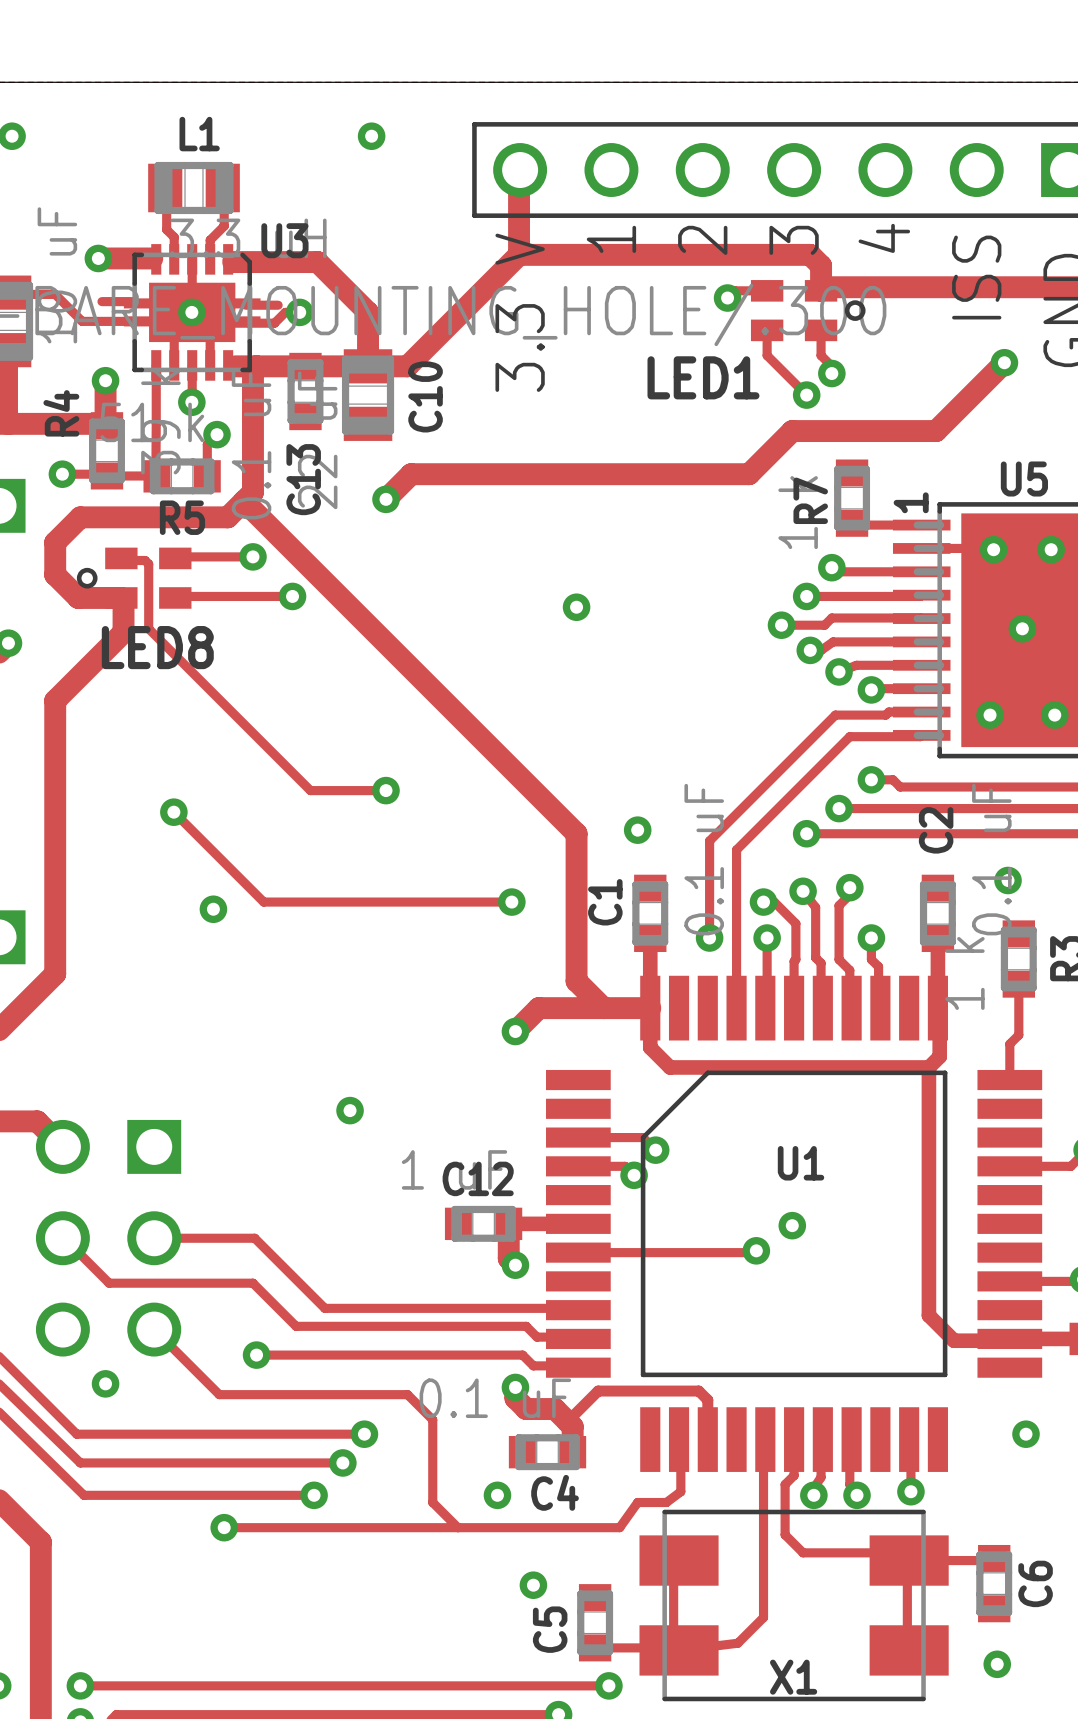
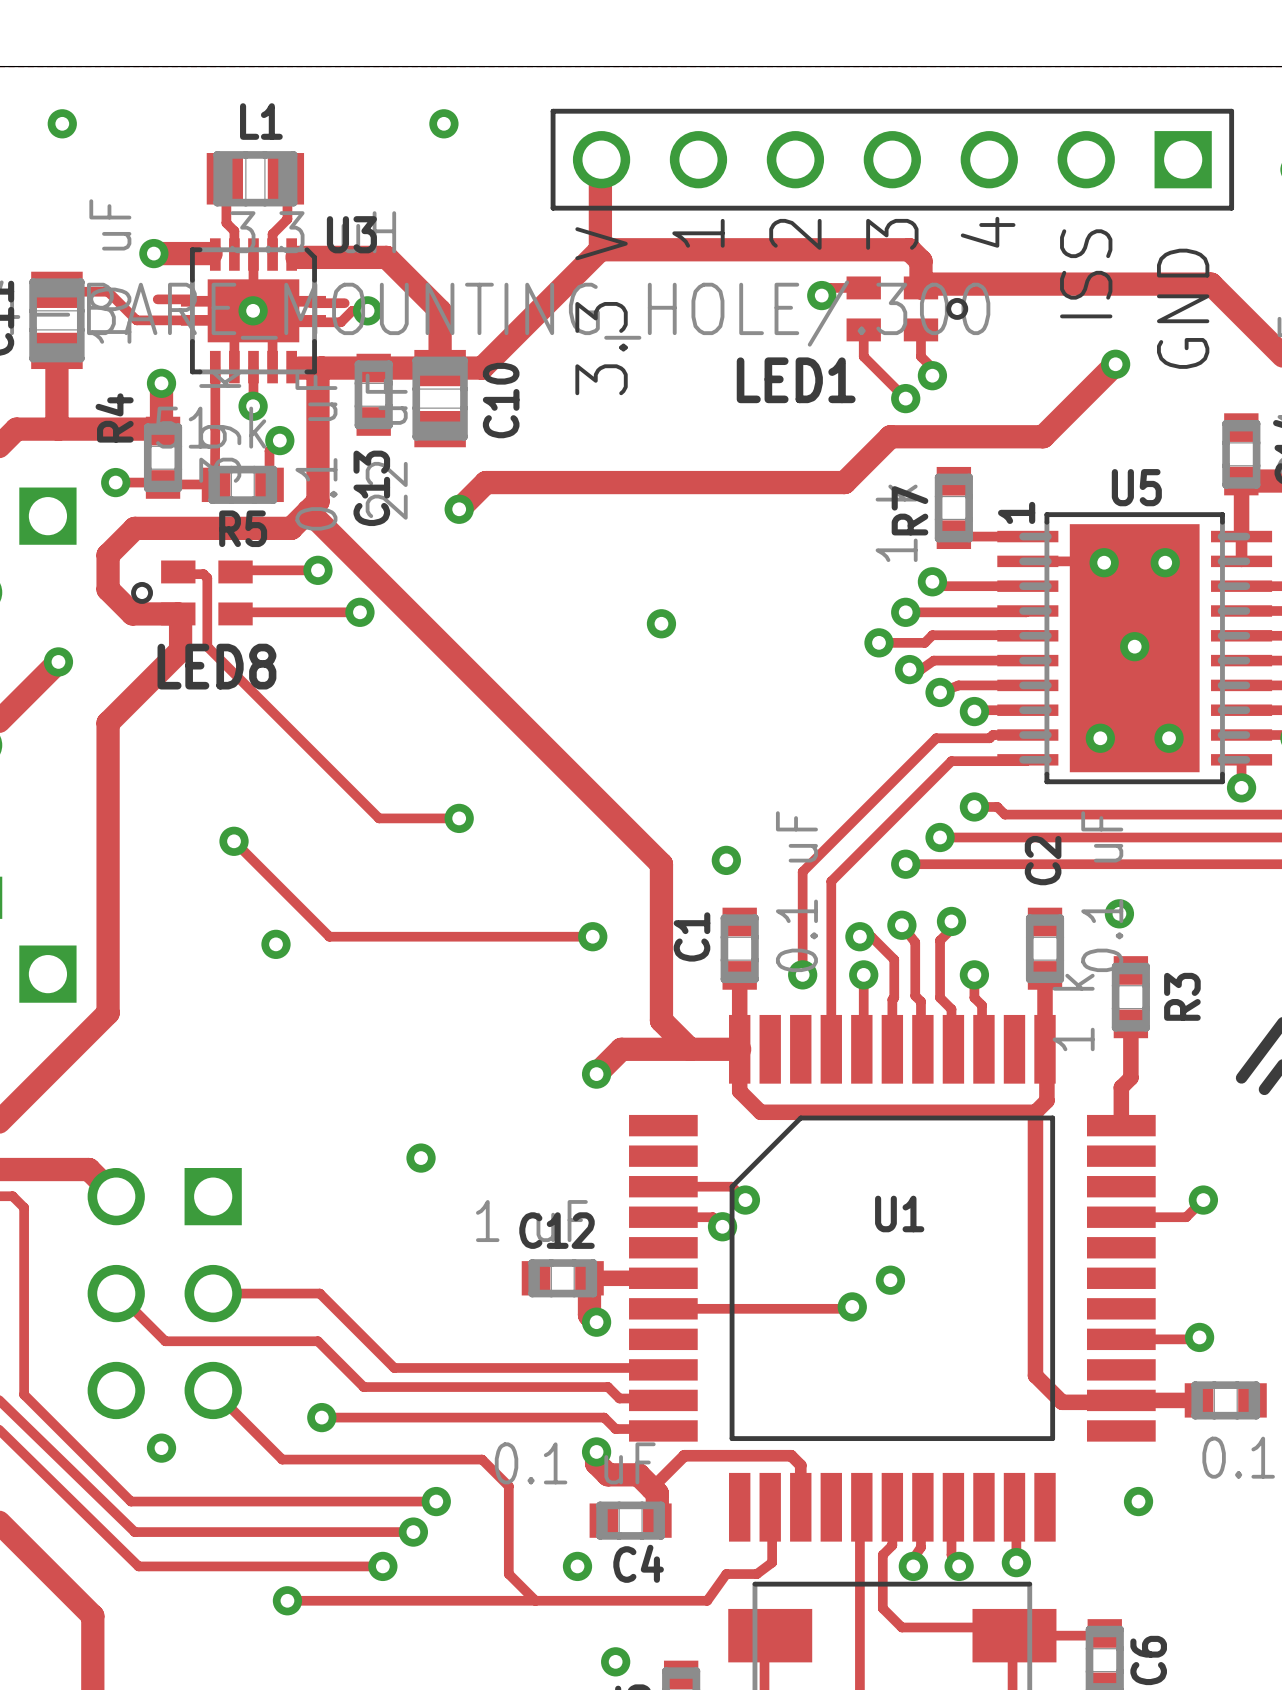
track width: thin (1018, 984) (1018, 1035) (1009, 1044) (1009, 1080) -> thick (1130, 1023) (1130, 1077) (1121, 1087) (1121, 1125)

